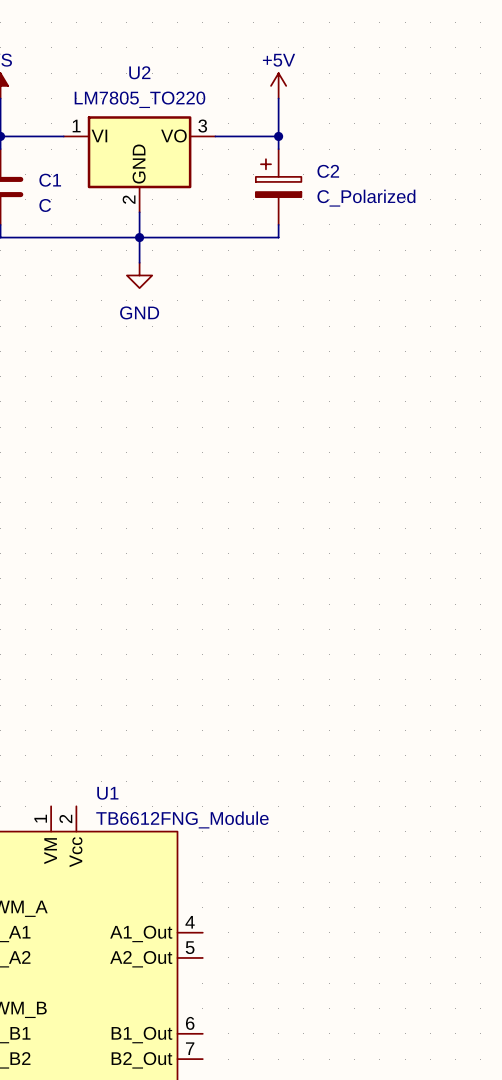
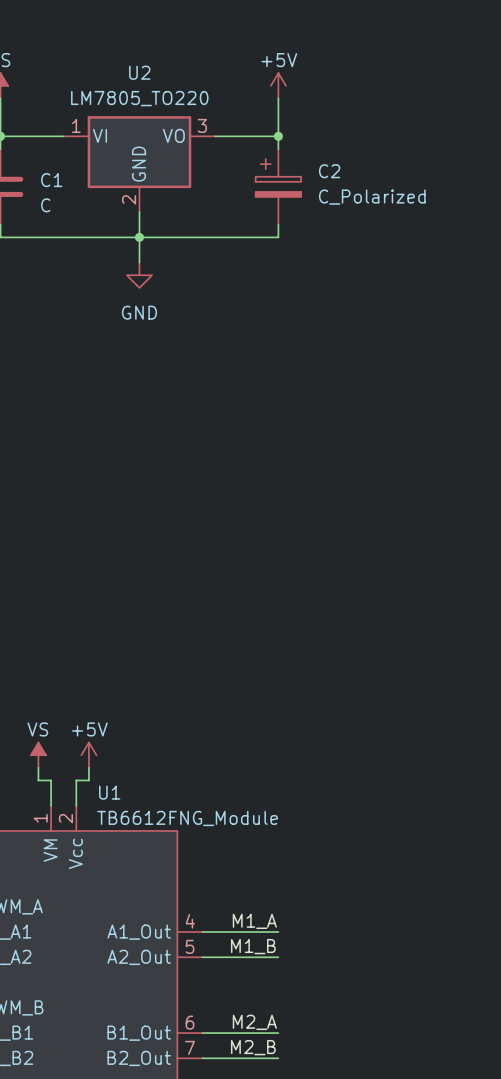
power symbol: none -> VS (38, 755)
power symbol: none -> +5V (88, 755)
wire: none -> (38, 767) (38, 780) (51, 780) (51, 805)
wire: none -> (88, 767) (88, 780) (76, 780) (76, 805)
label: none -> M1_A (254, 921)
wire: none -> (202, 932) (278, 932)
label: none -> M1_B (253, 946)
wire: none -> (202, 957) (278, 957)
label: none -> M2_A (254, 1022)
wire: none -> (202, 1033) (278, 1033)
label: none -> M2_B (253, 1047)
wire: none -> (202, 1058) (278, 1058)

